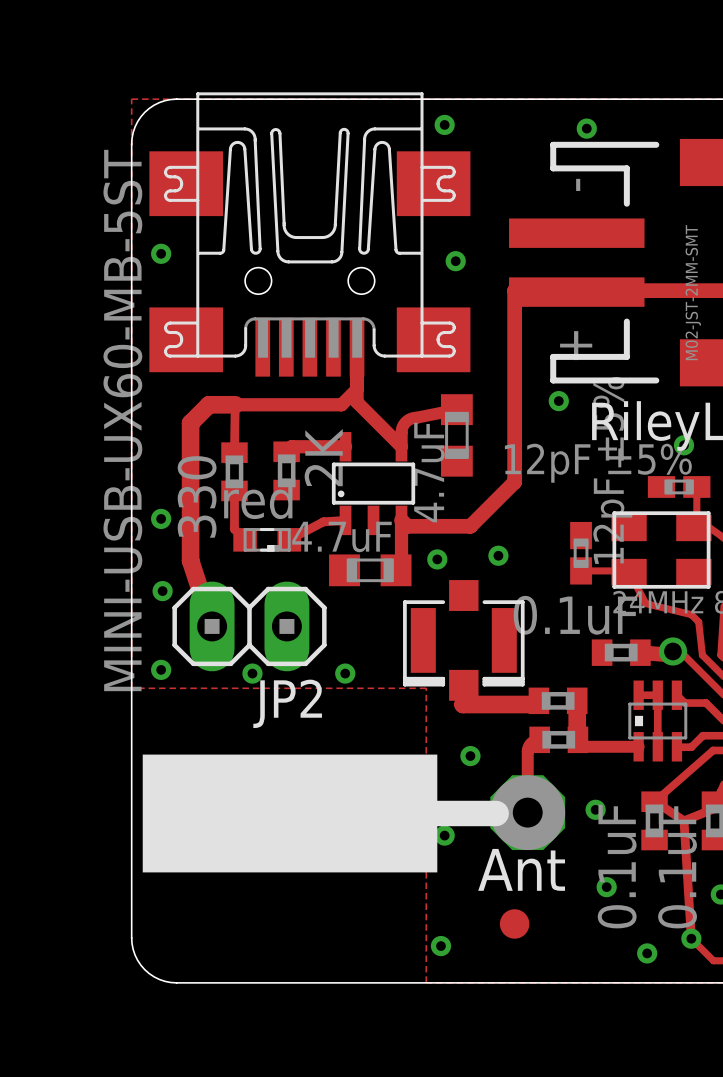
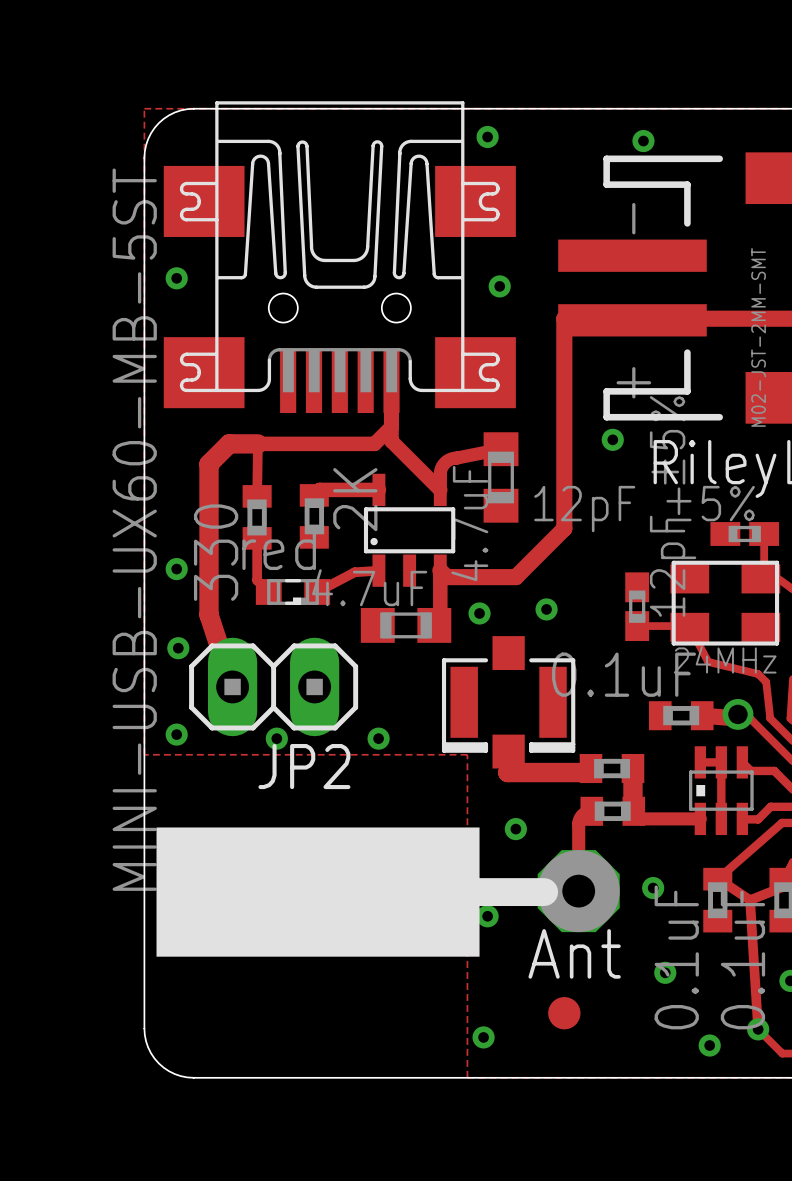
via: (684, 445) -> none

